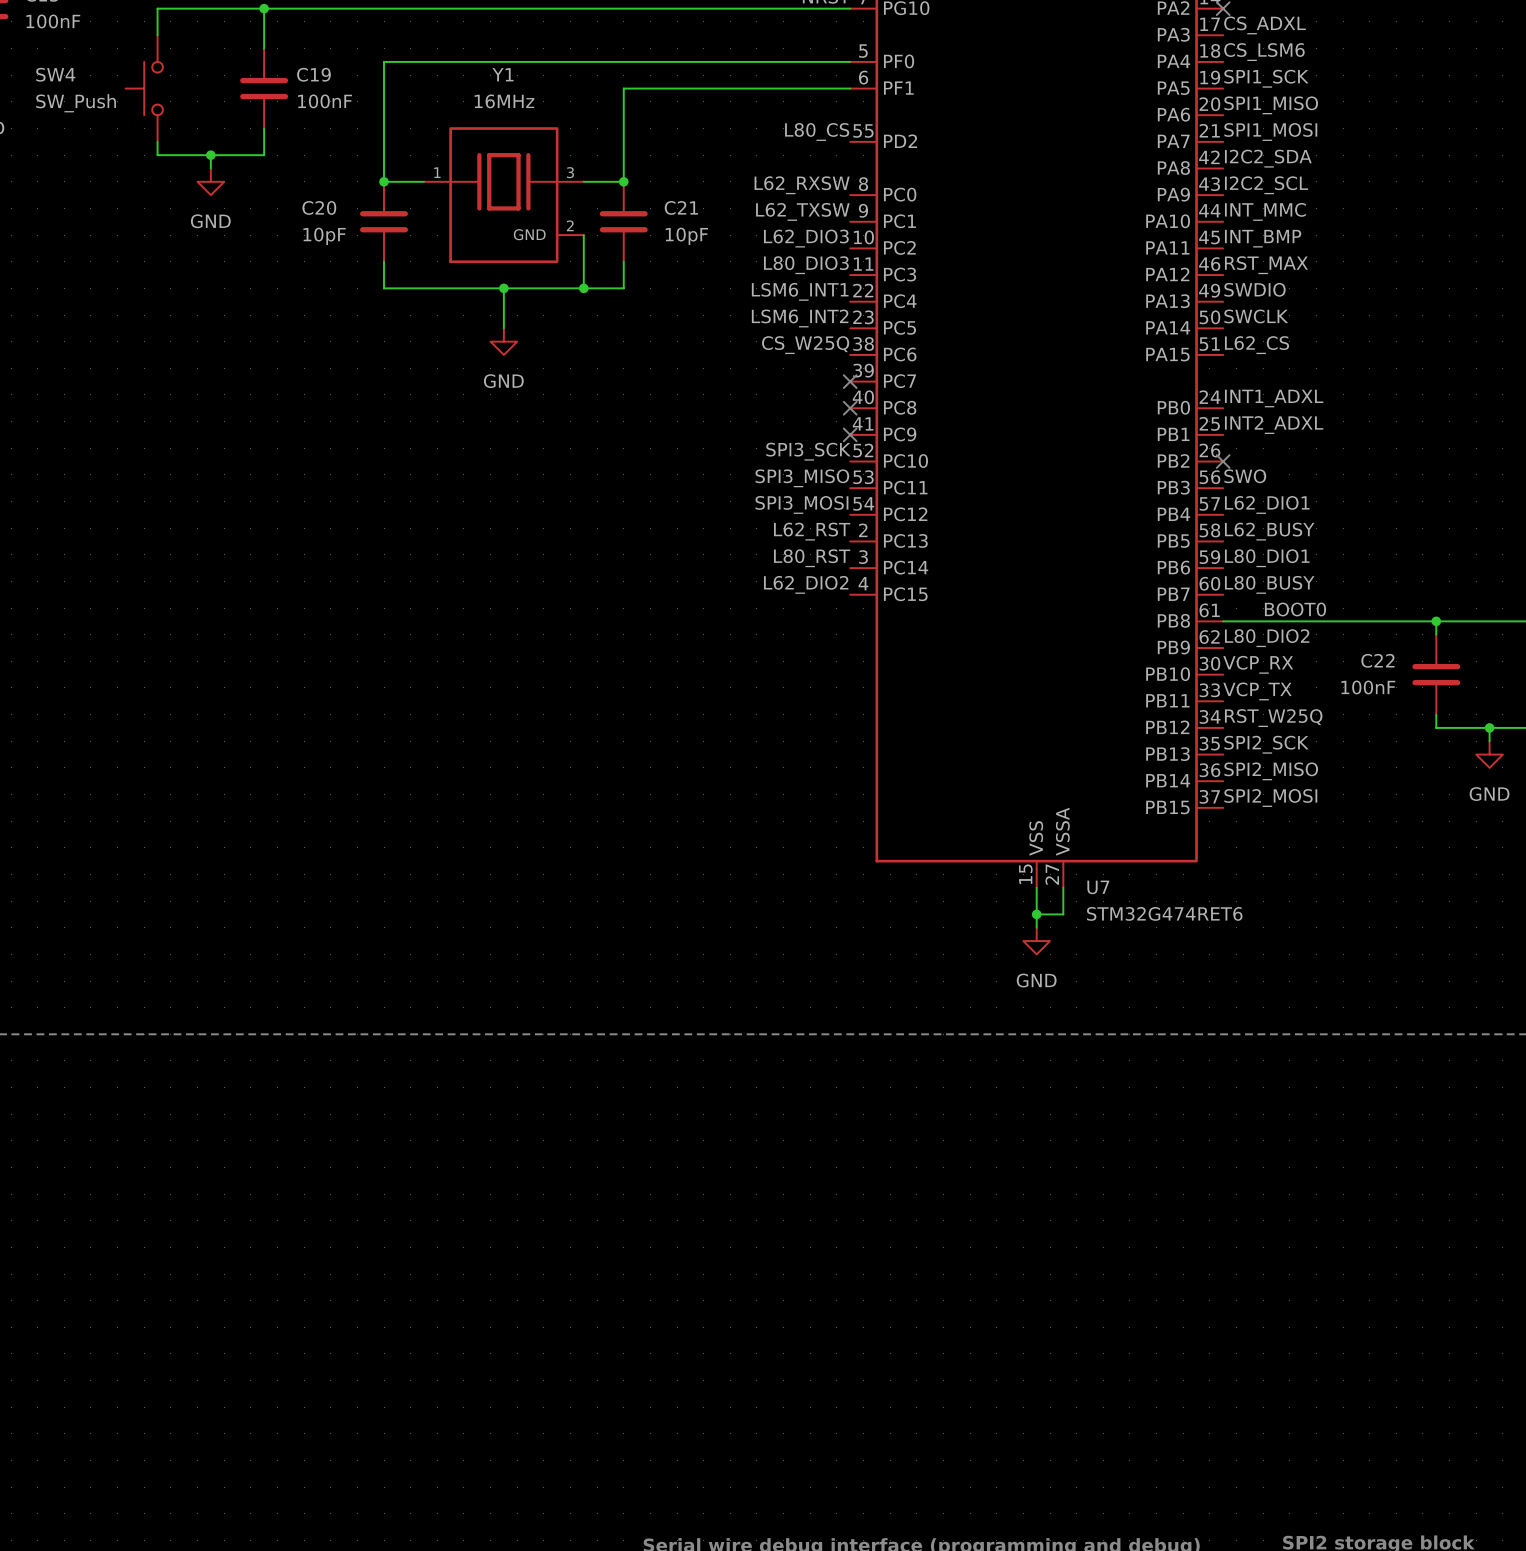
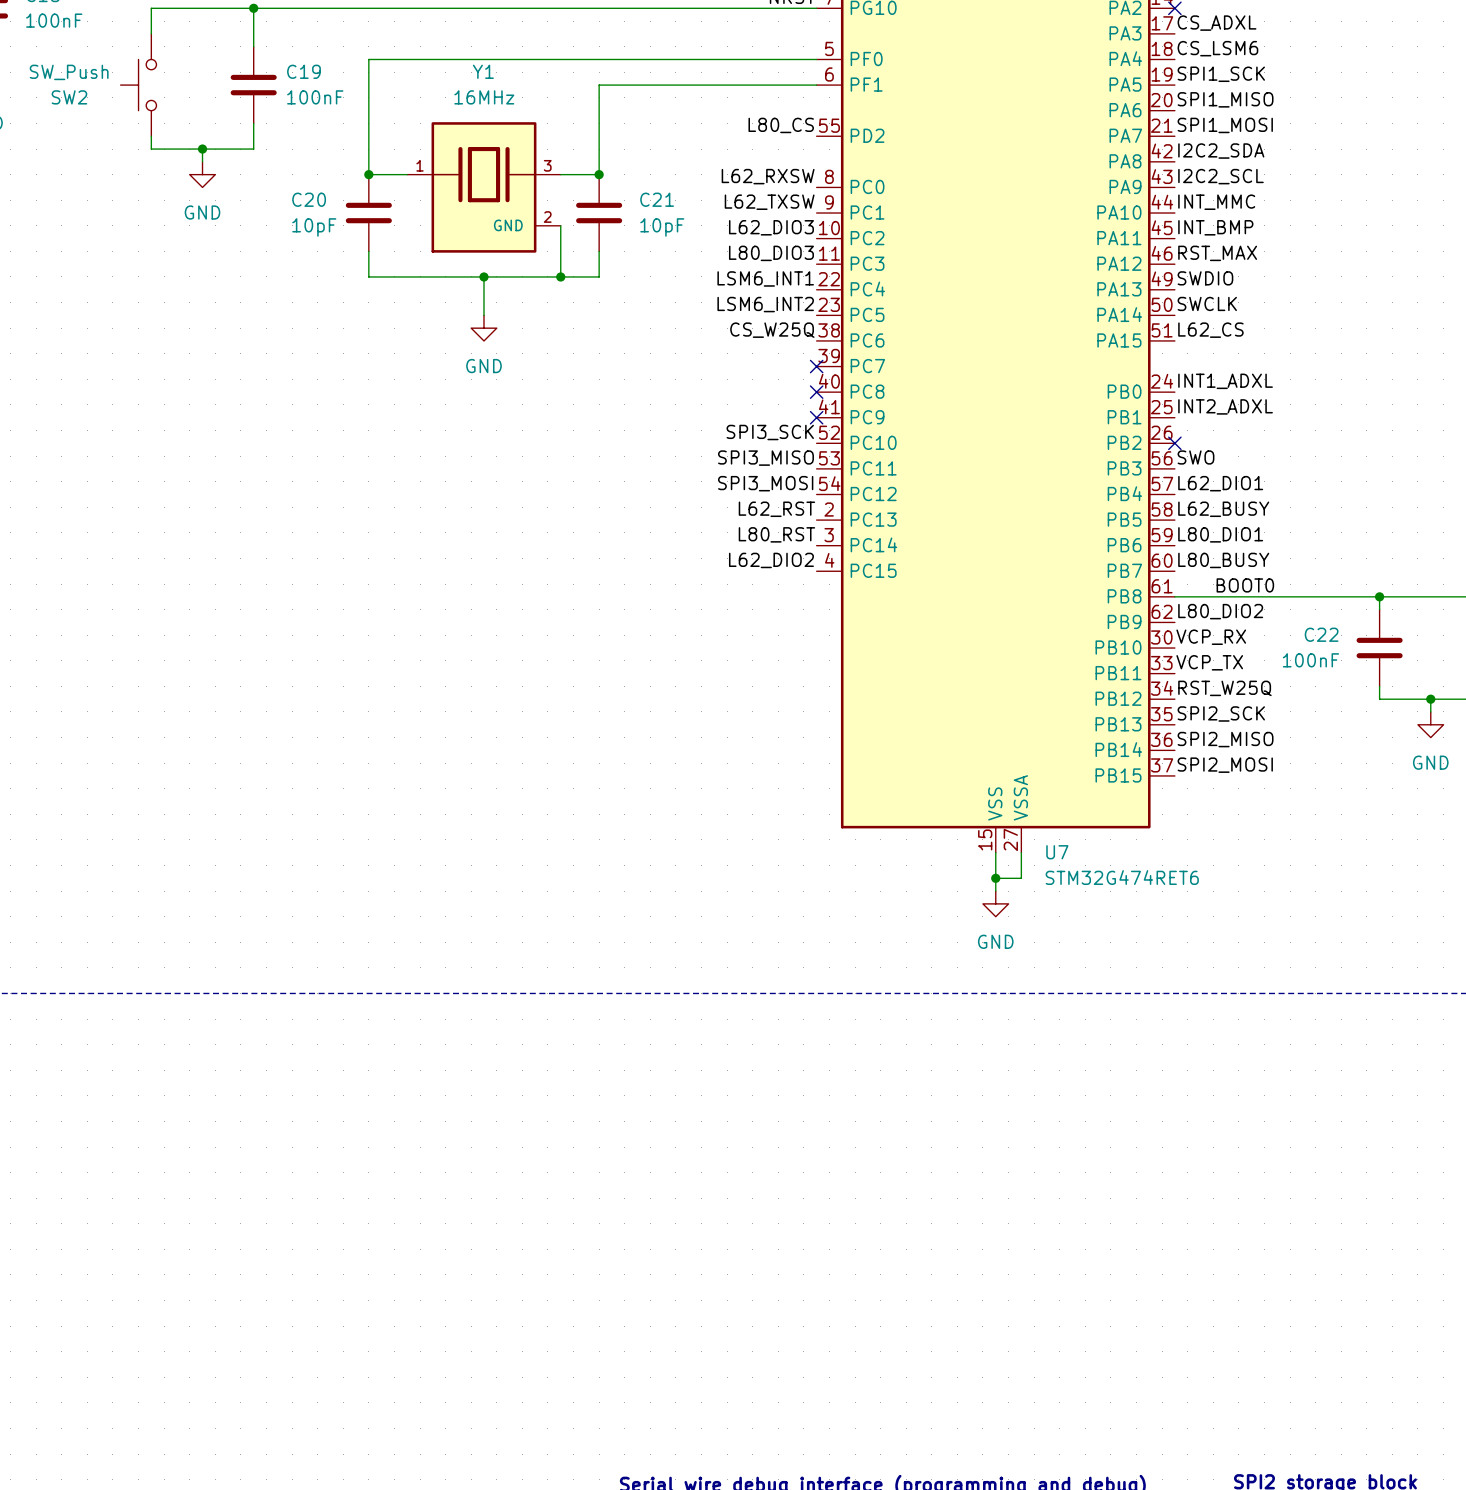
SW4 name: SW4 (55, 74) -> SW2 (69, 97)
SW4 value position: SW_Push (76, 103) -> SW_Push (69, 72)

